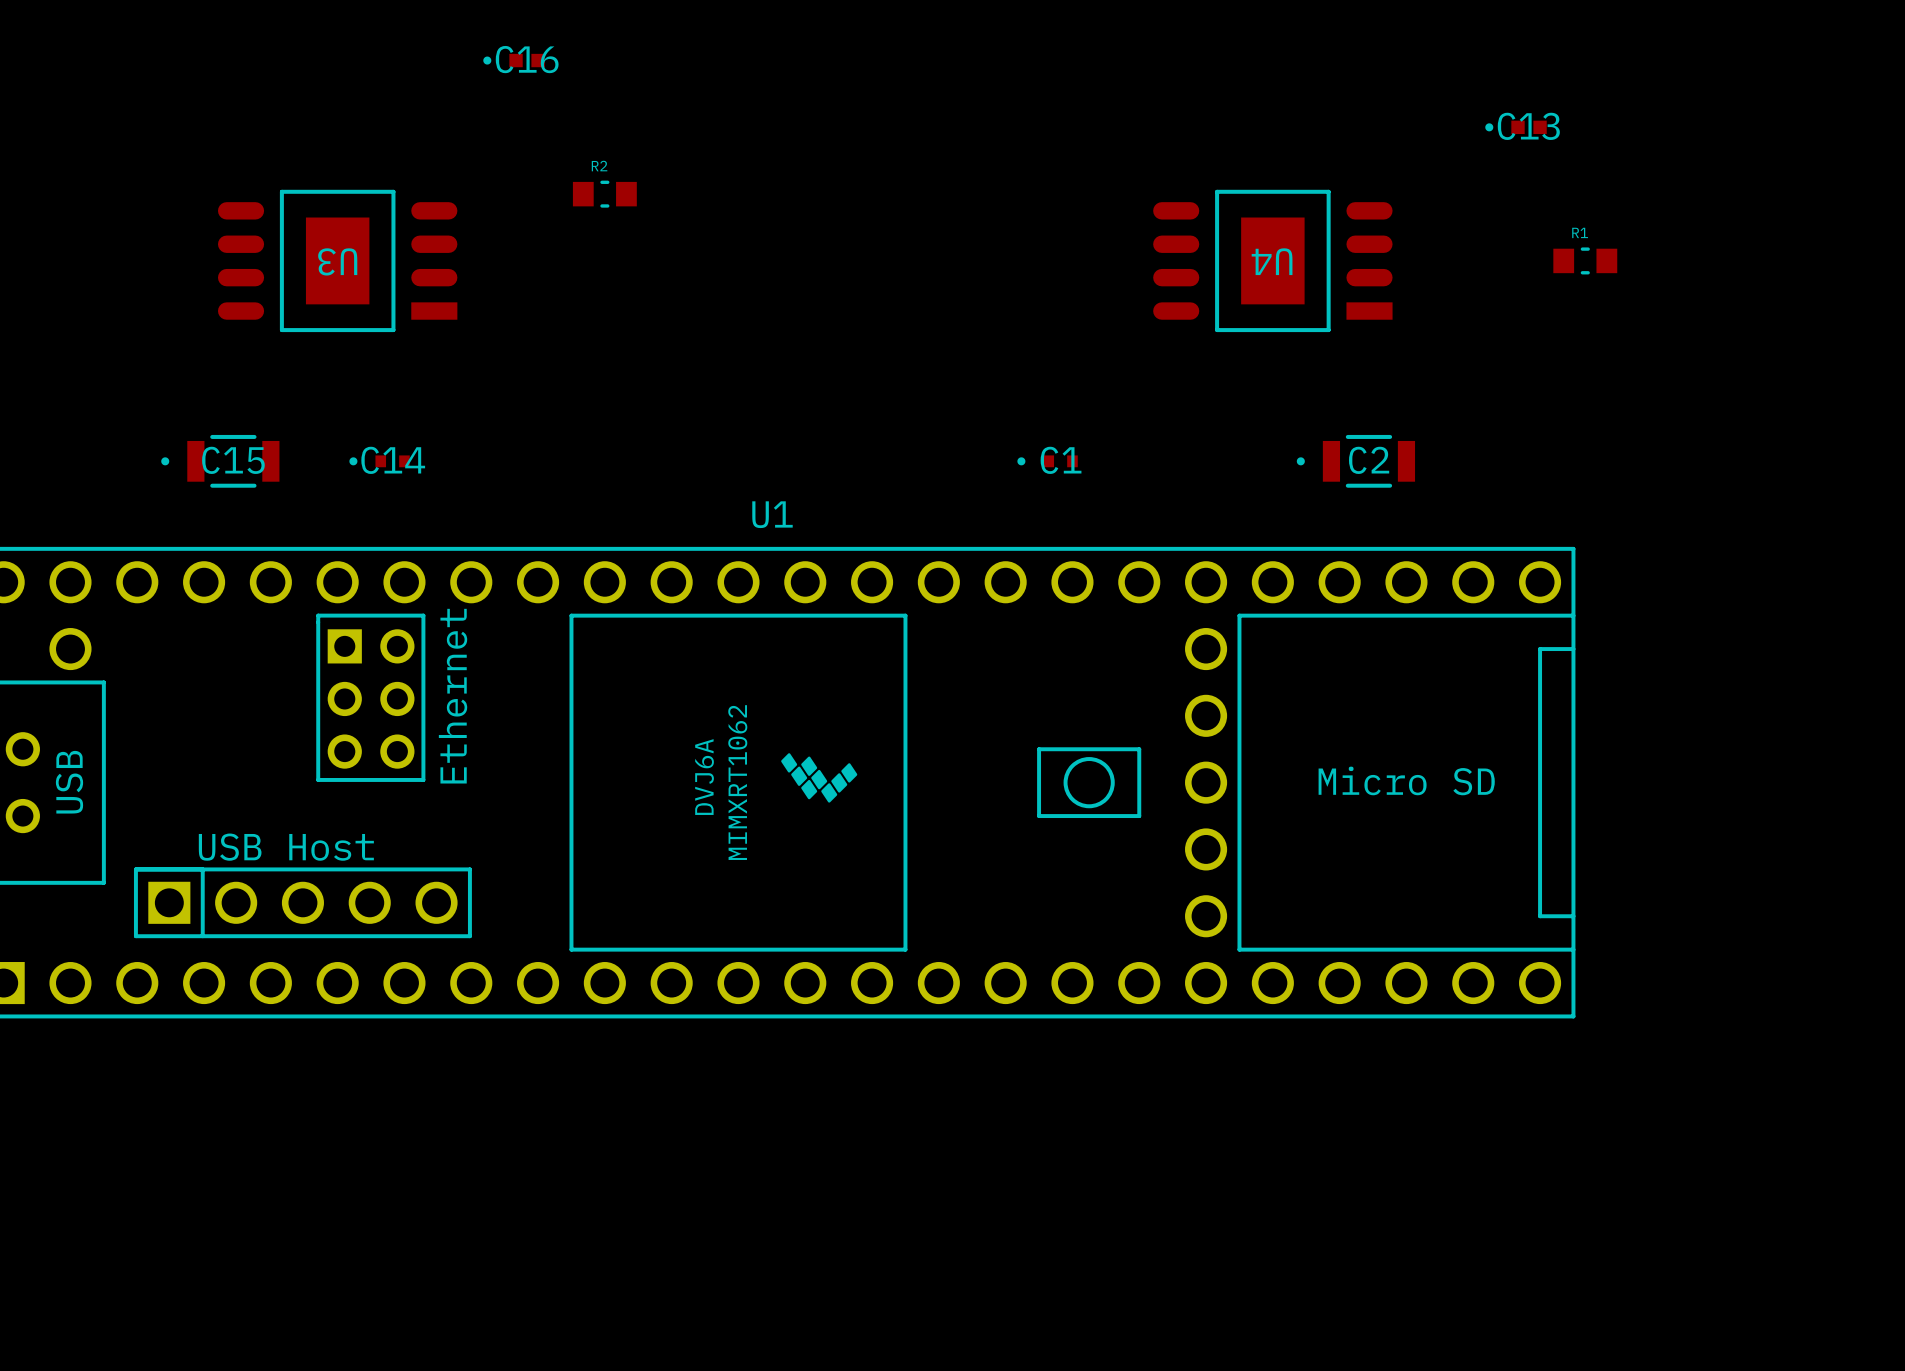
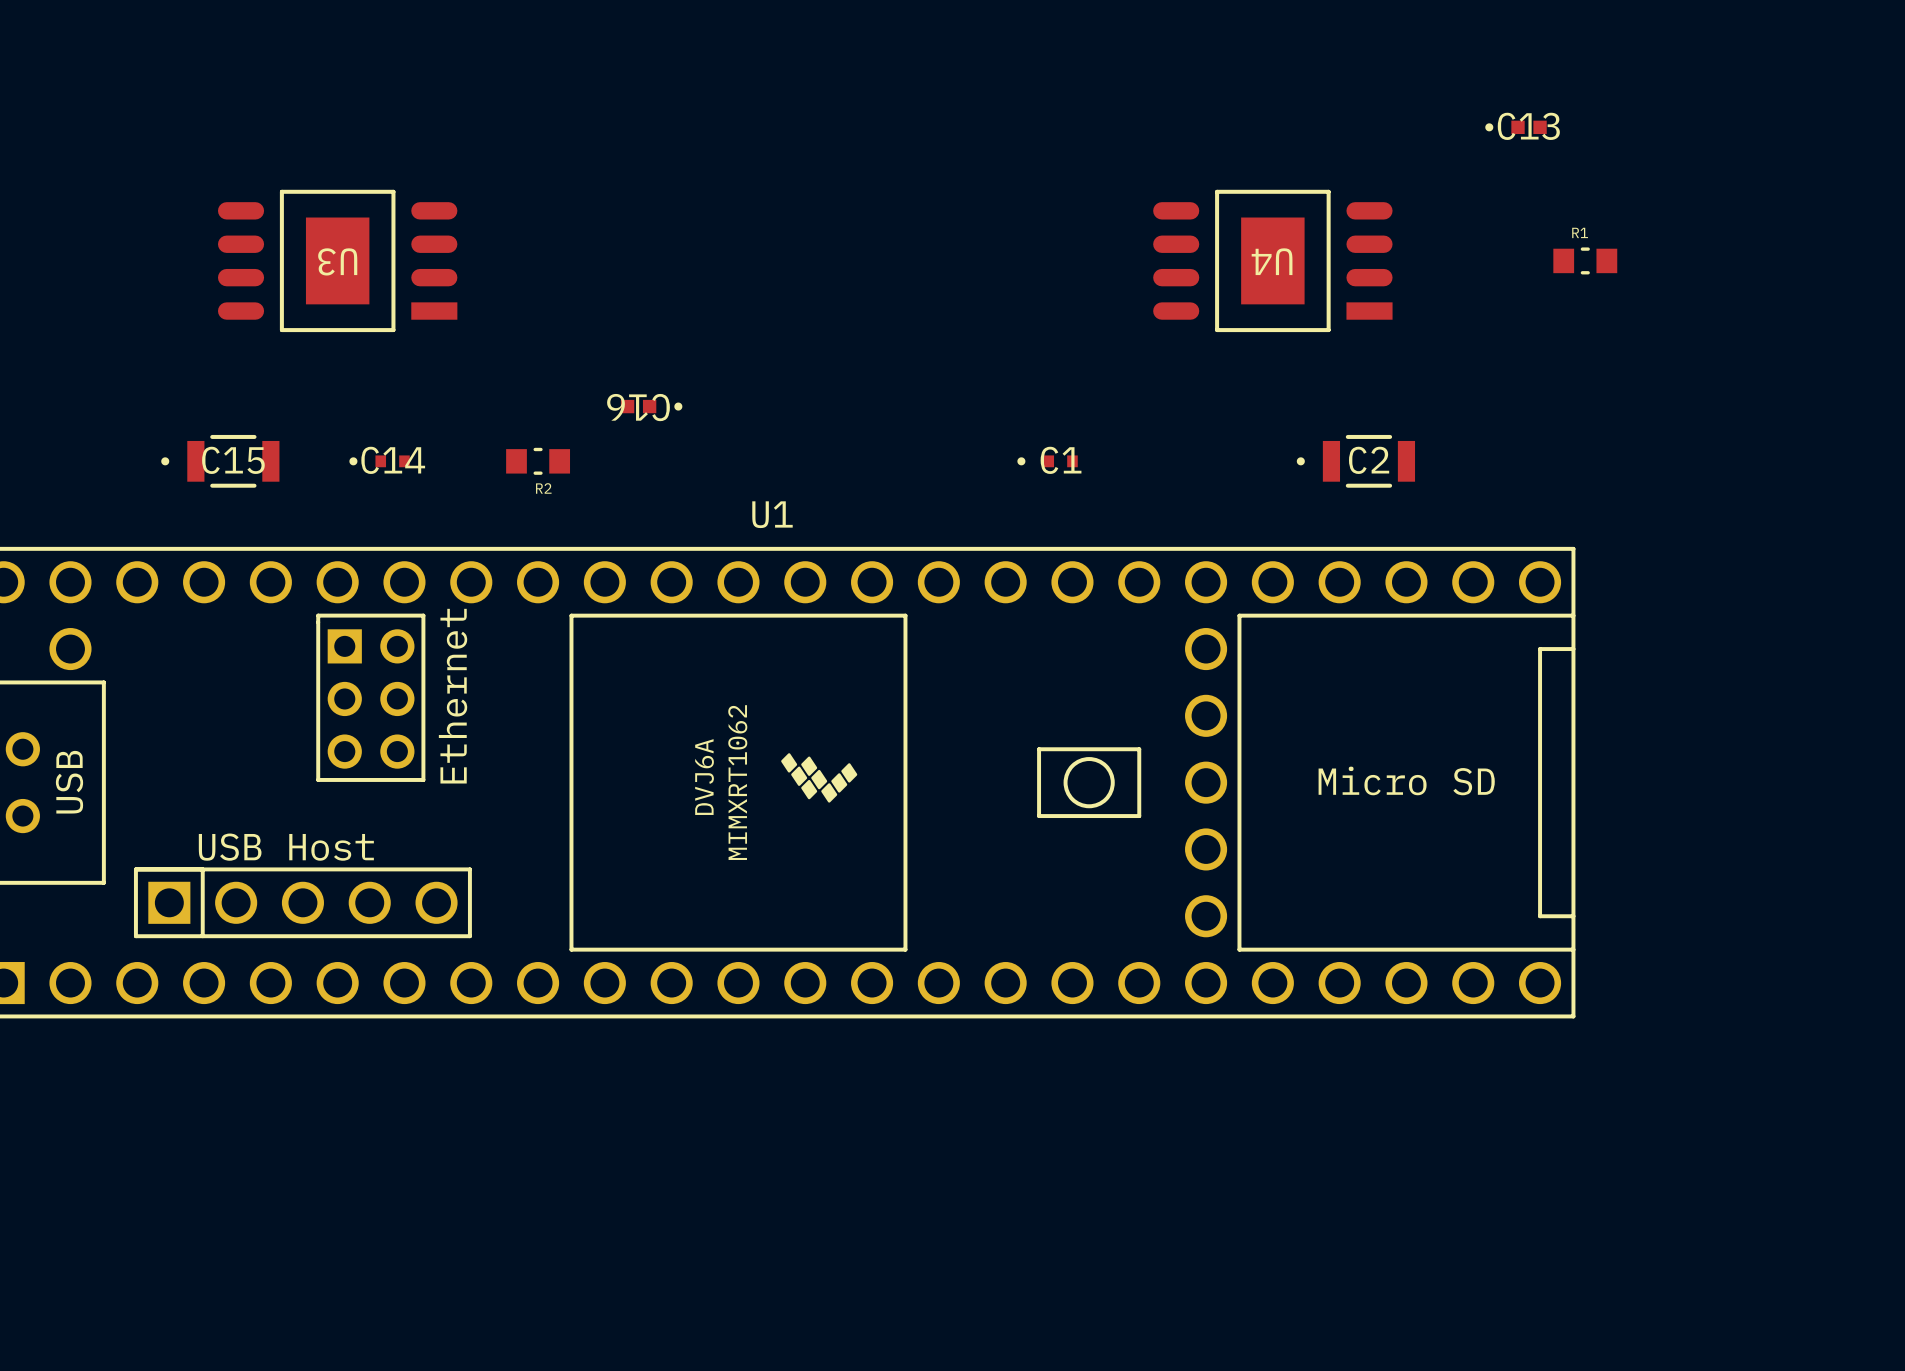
C16 rotation: 0° (514, 60) -> 180° (651, 406)
C16 position: (514, 60) -> (651, 406)
R2 name position: R2 (599, 166) -> R2 (543, 488)
R2 position: (604, 194) -> (538, 461)

